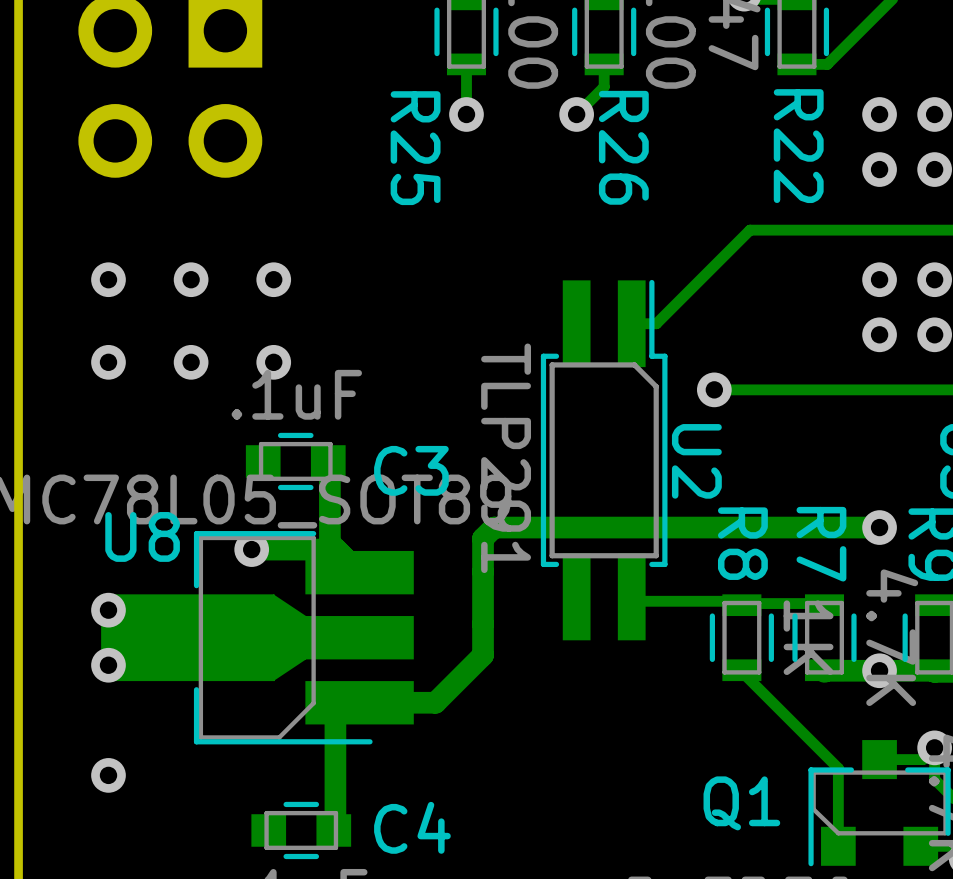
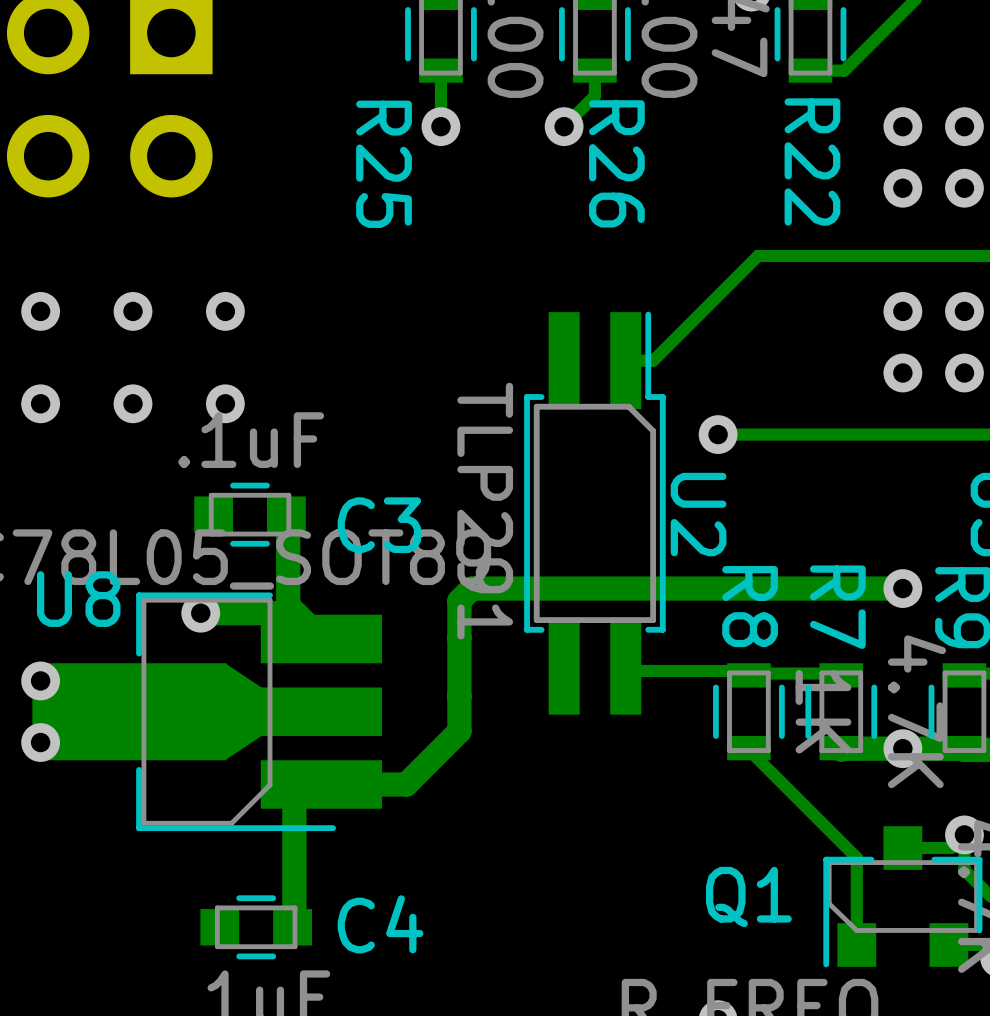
via: (108, 775) -> none

